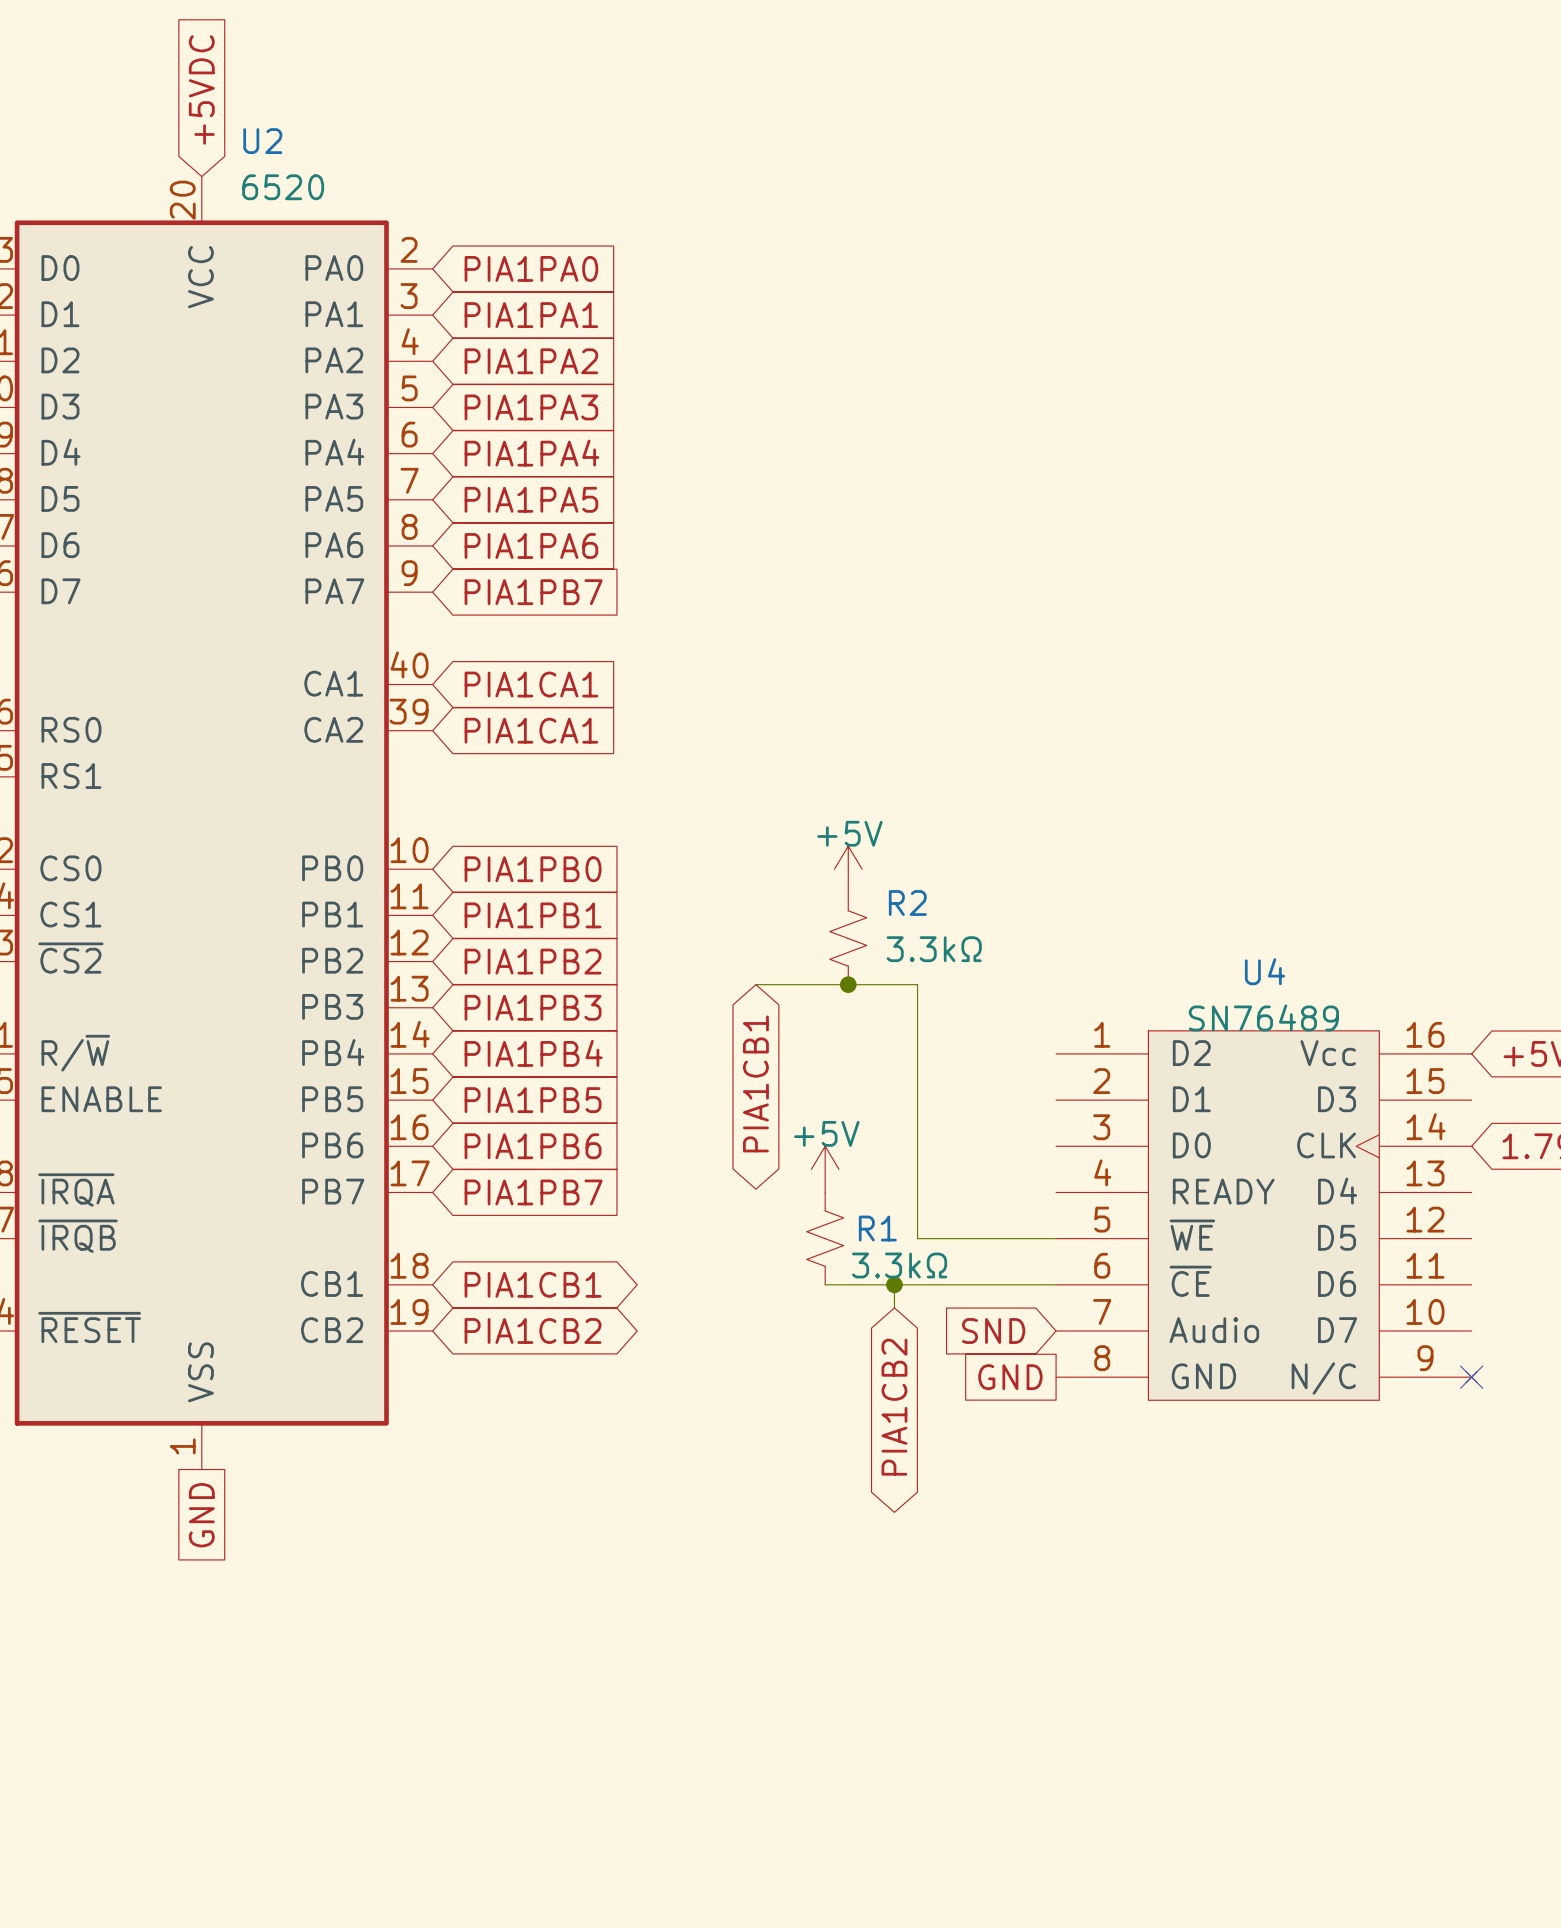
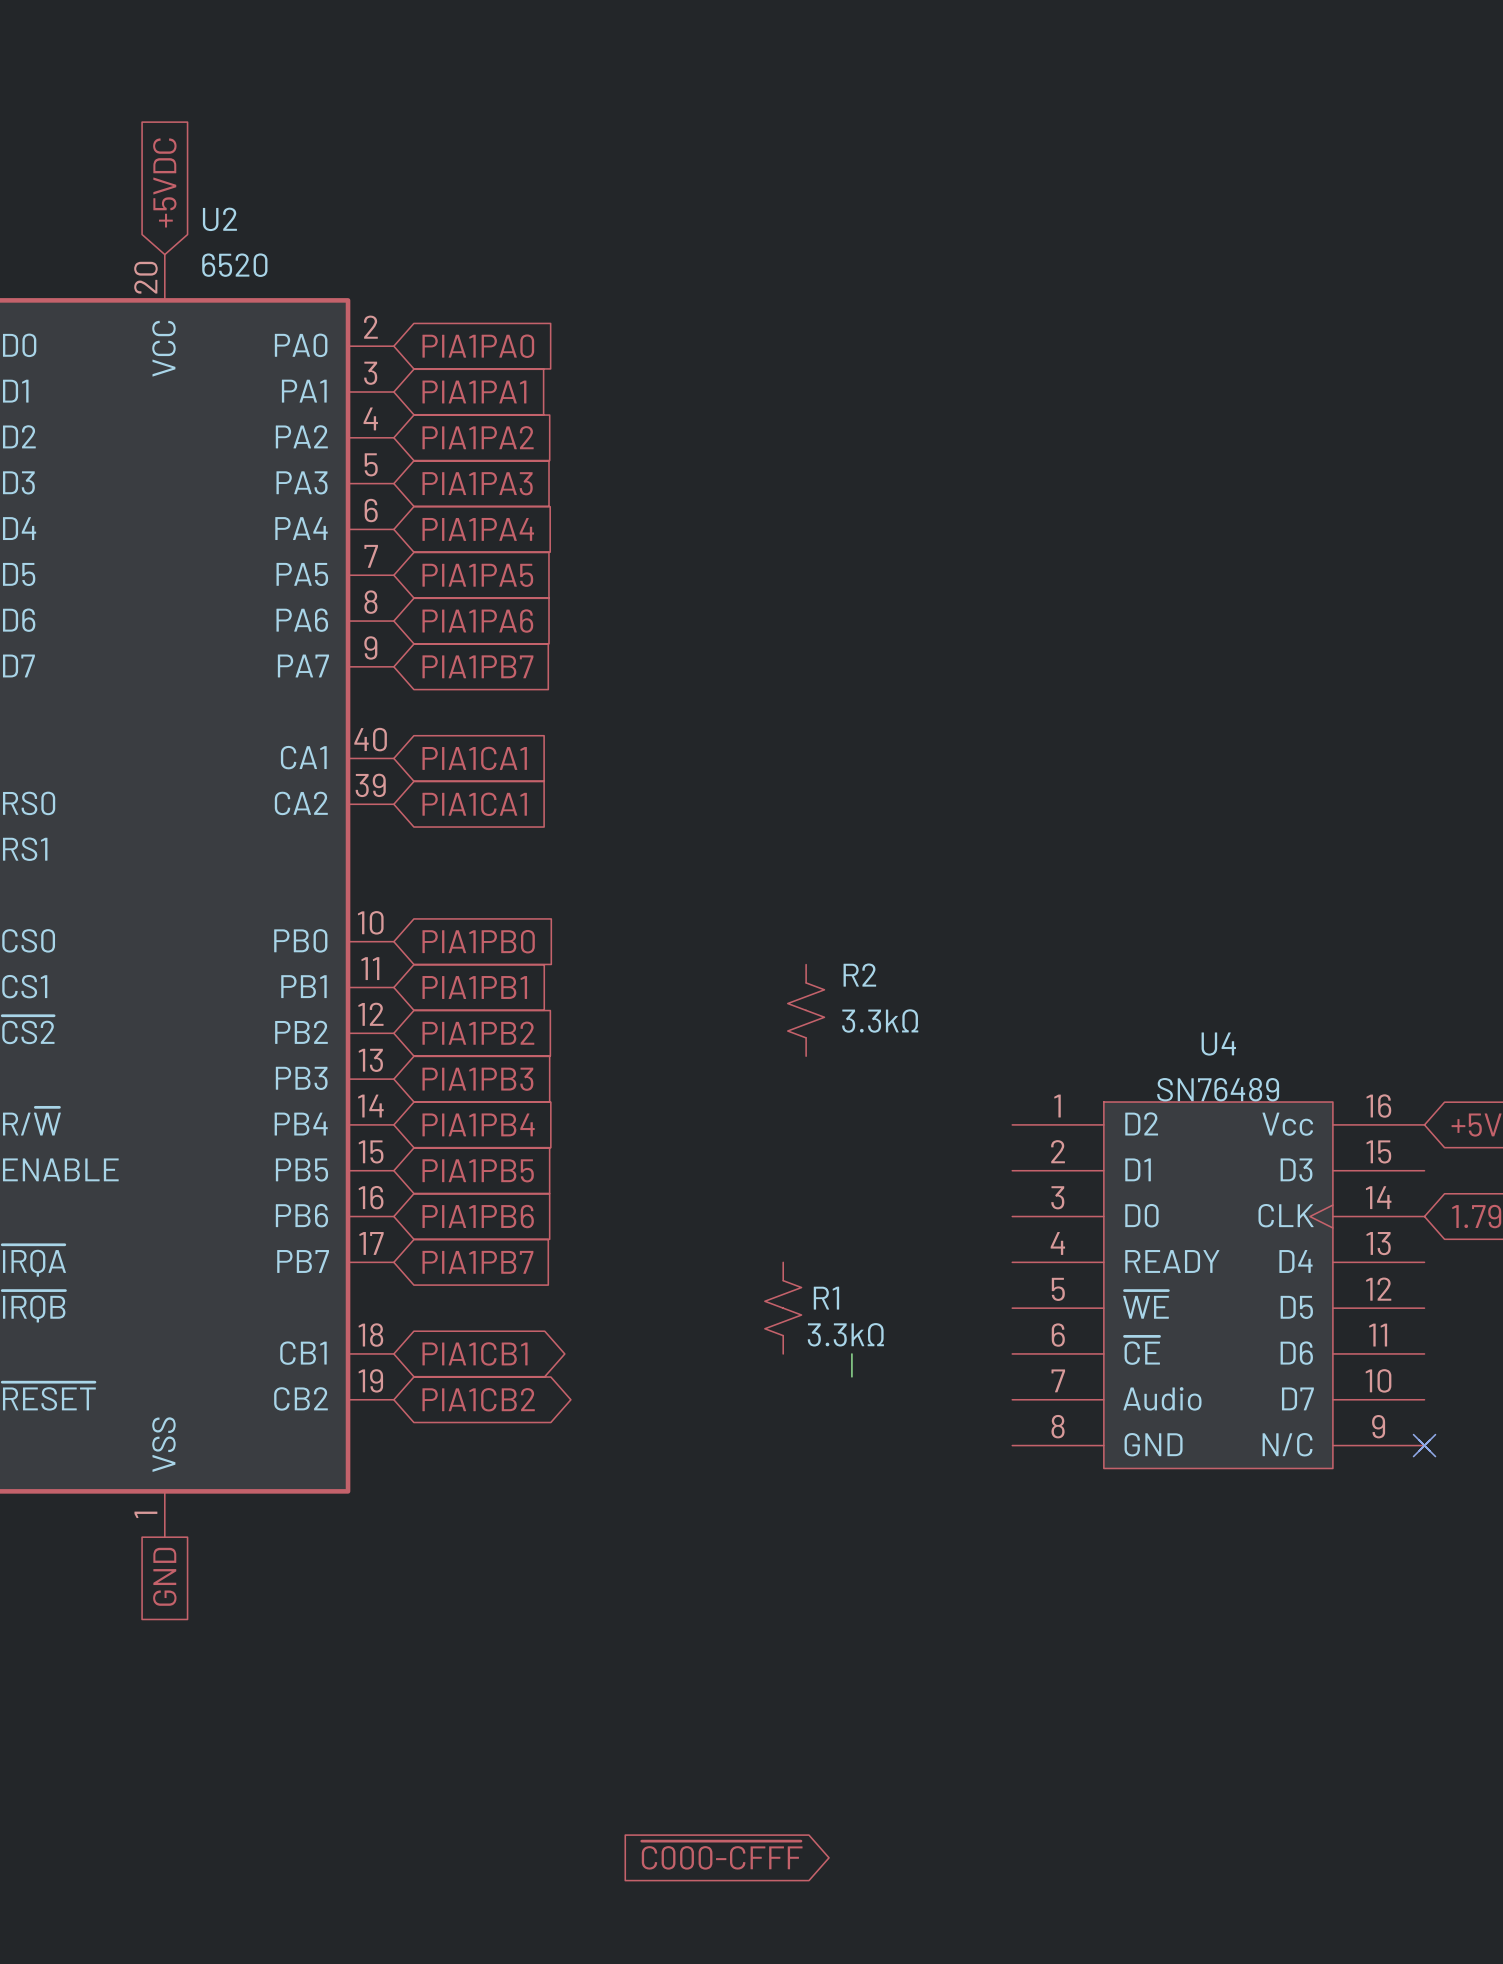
power symbol: +5V (848, 869) -> none
wire: (755, 984) (917, 984) (917, 1238) (1056, 1238) -> none
junction: (848, 984) -> none
global label: PIA1CB1 (755, 1083) -> none
power symbol: +5V (825, 1169) -> none
wire: (825, 1284) (1056, 1284) -> none
junction: (894, 1284) -> none
global label: SND (993, 1331) -> none
global label: GND (1010, 1377) -> none
global label: PIA1CB2 (894, 1407) -> none
global label: none -> ~{C000-CFFF} (722, 1855)

